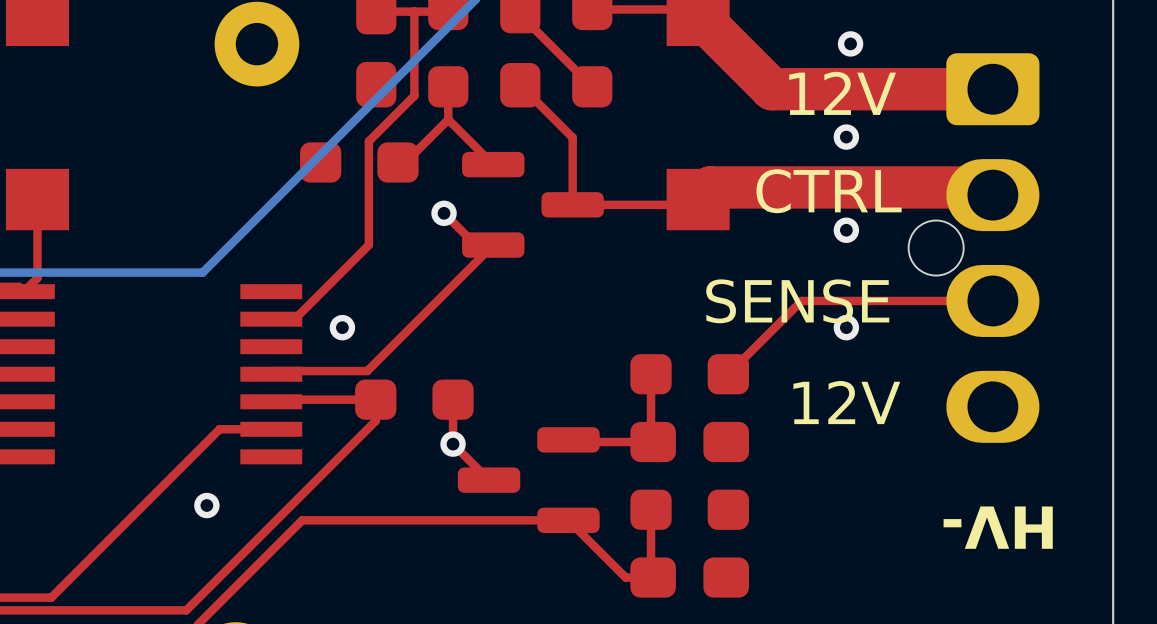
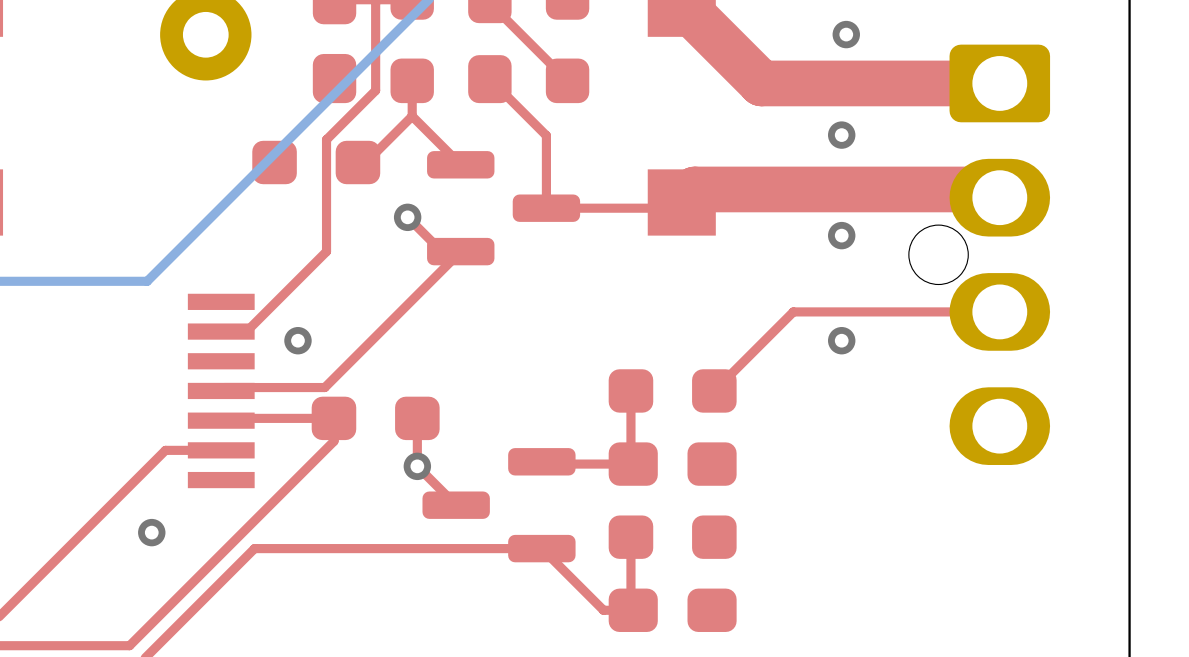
text: 12V (842, 93) -> none
text: CTRL (829, 191) -> none
text: SENSE (797, 301) -> none
text: 12V (846, 402) -> none
text: HV- (998, 527) -> none

